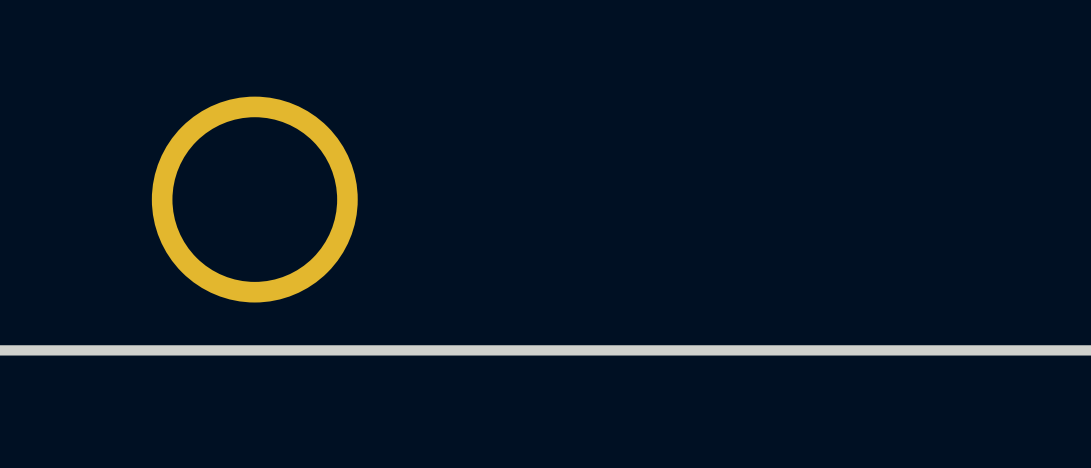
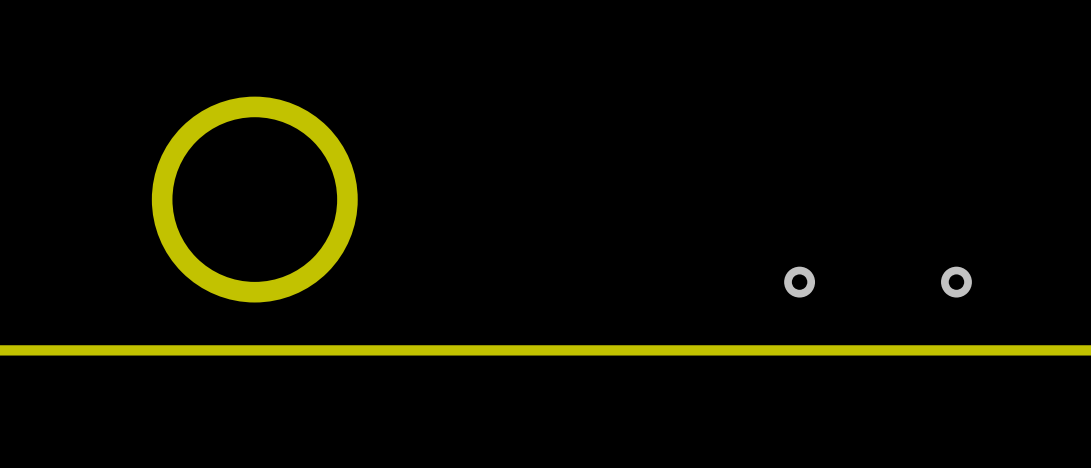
via: none -> (799, 282)
via: none -> (956, 282)

